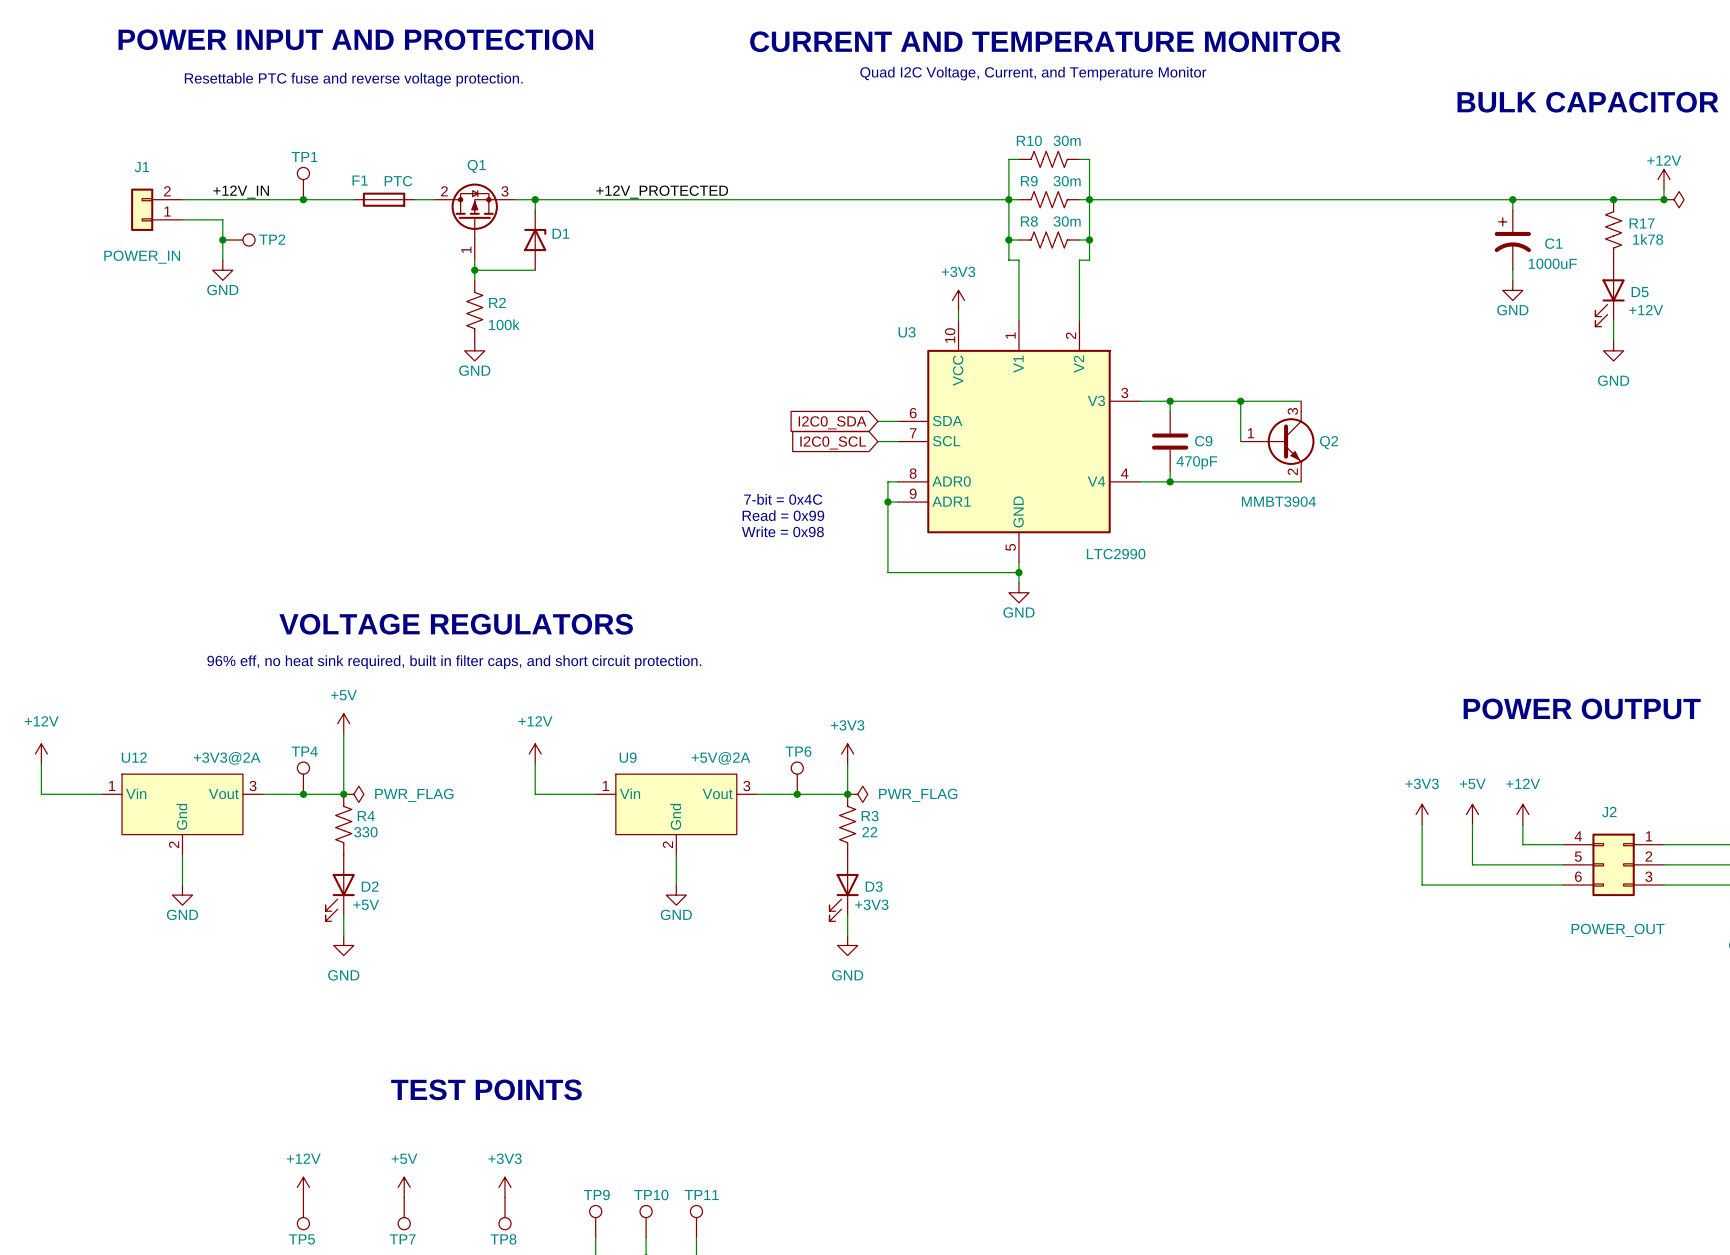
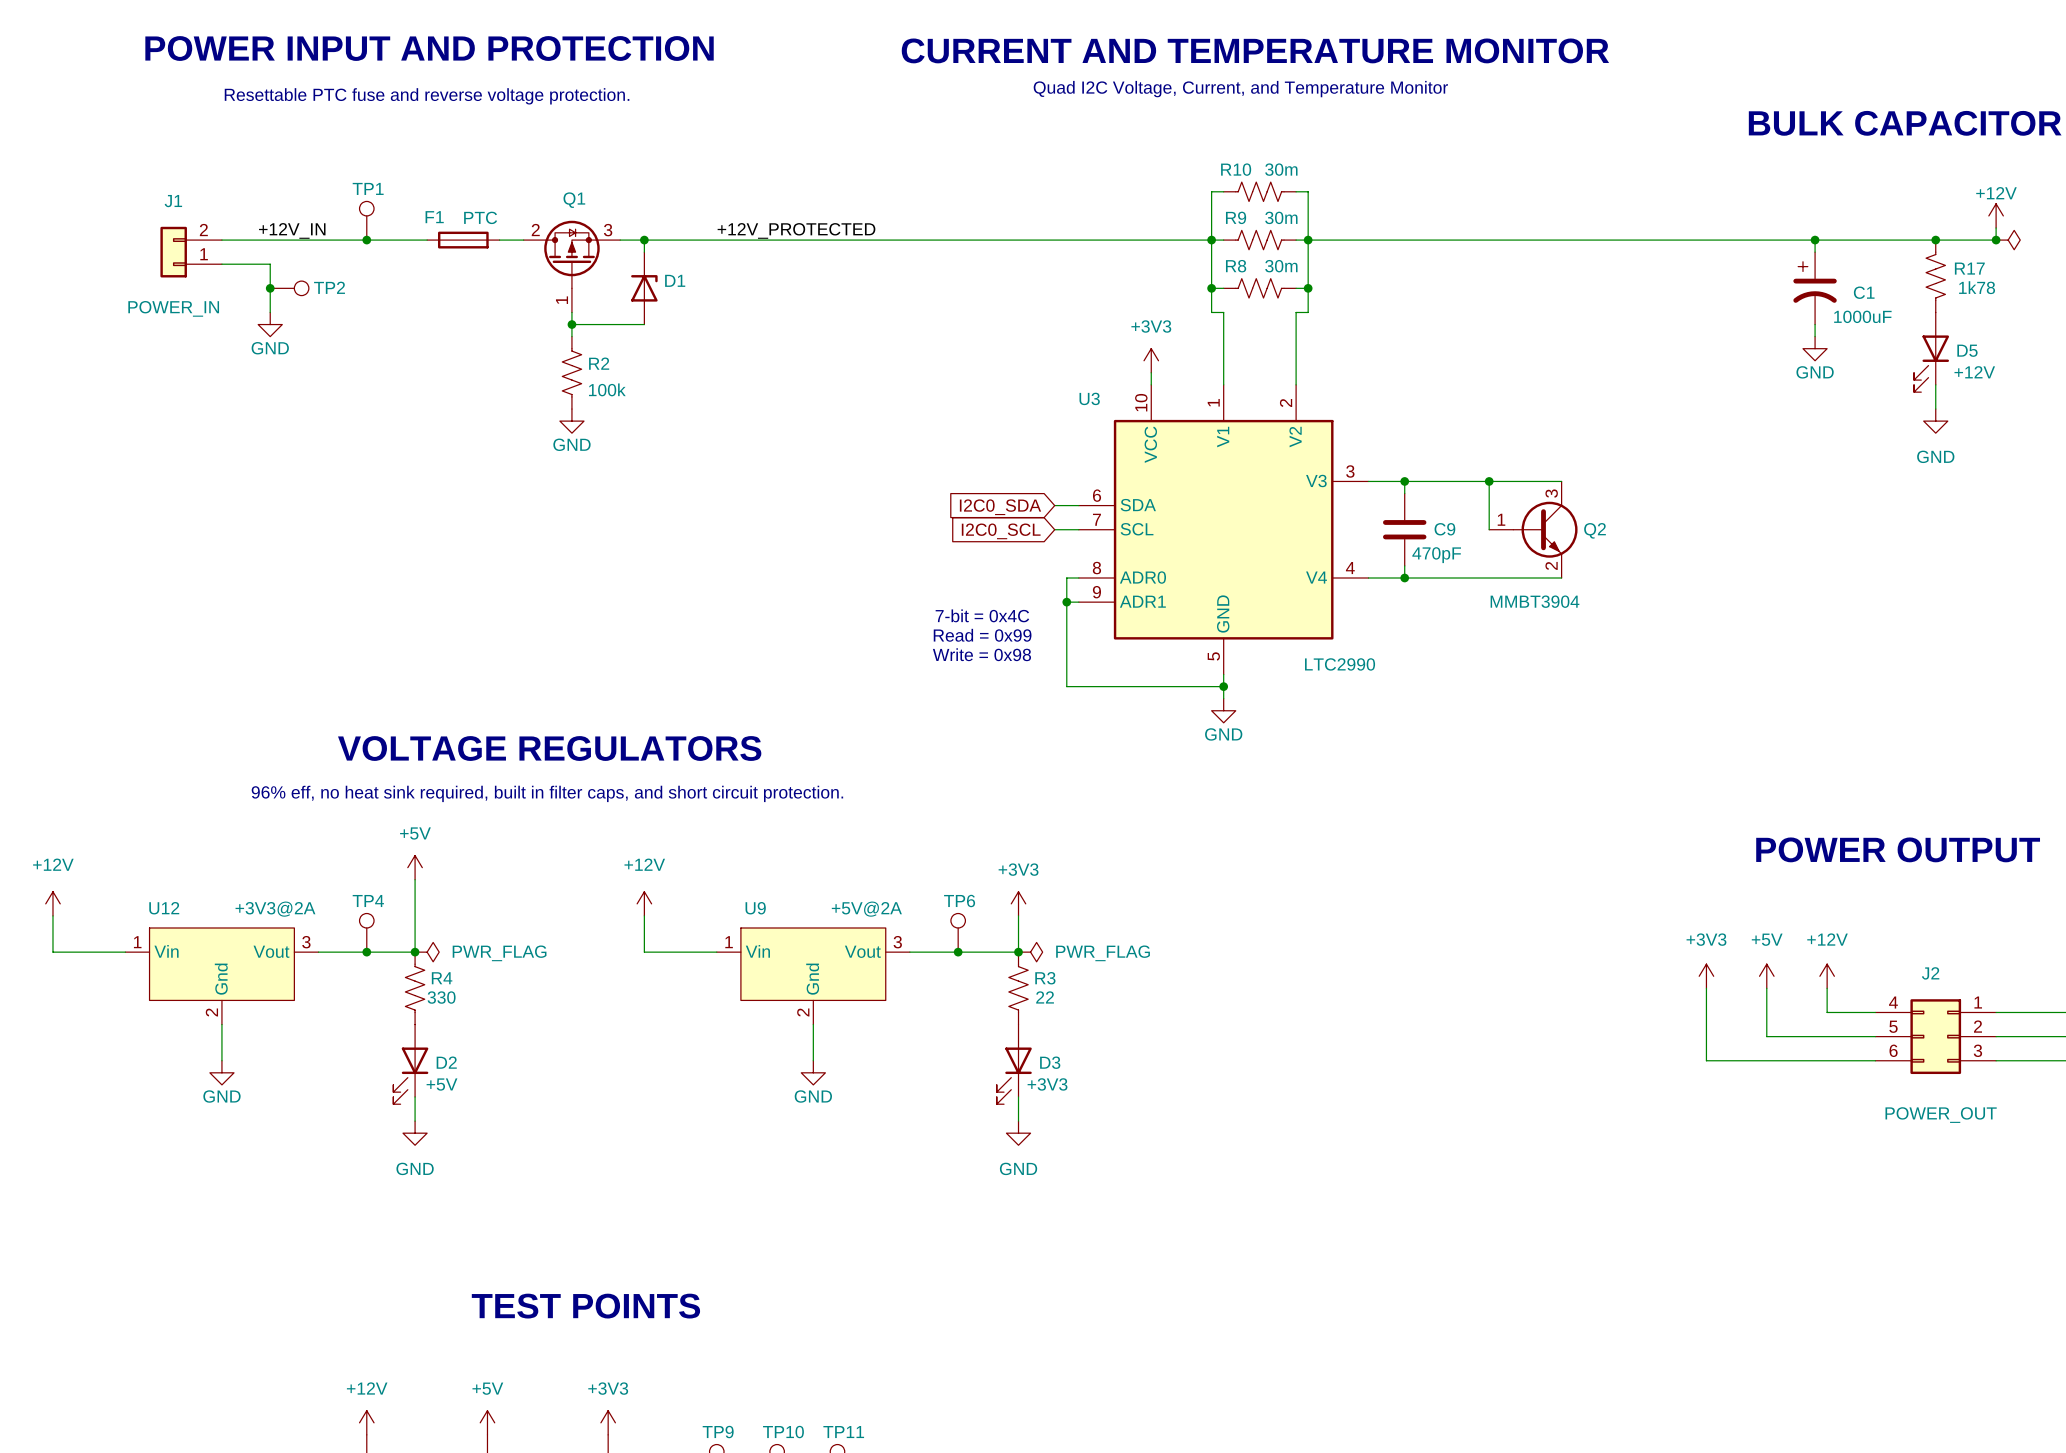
text position: 7-bit = 0x4C (783, 499) -> 7-bit = 0x4C (982, 615)
text position: Read = 0x99 (783, 515) -> Read = 0x99 (982, 635)
text position: Write = 0x98 (782, 531) -> Write = 0x98 (981, 654)

